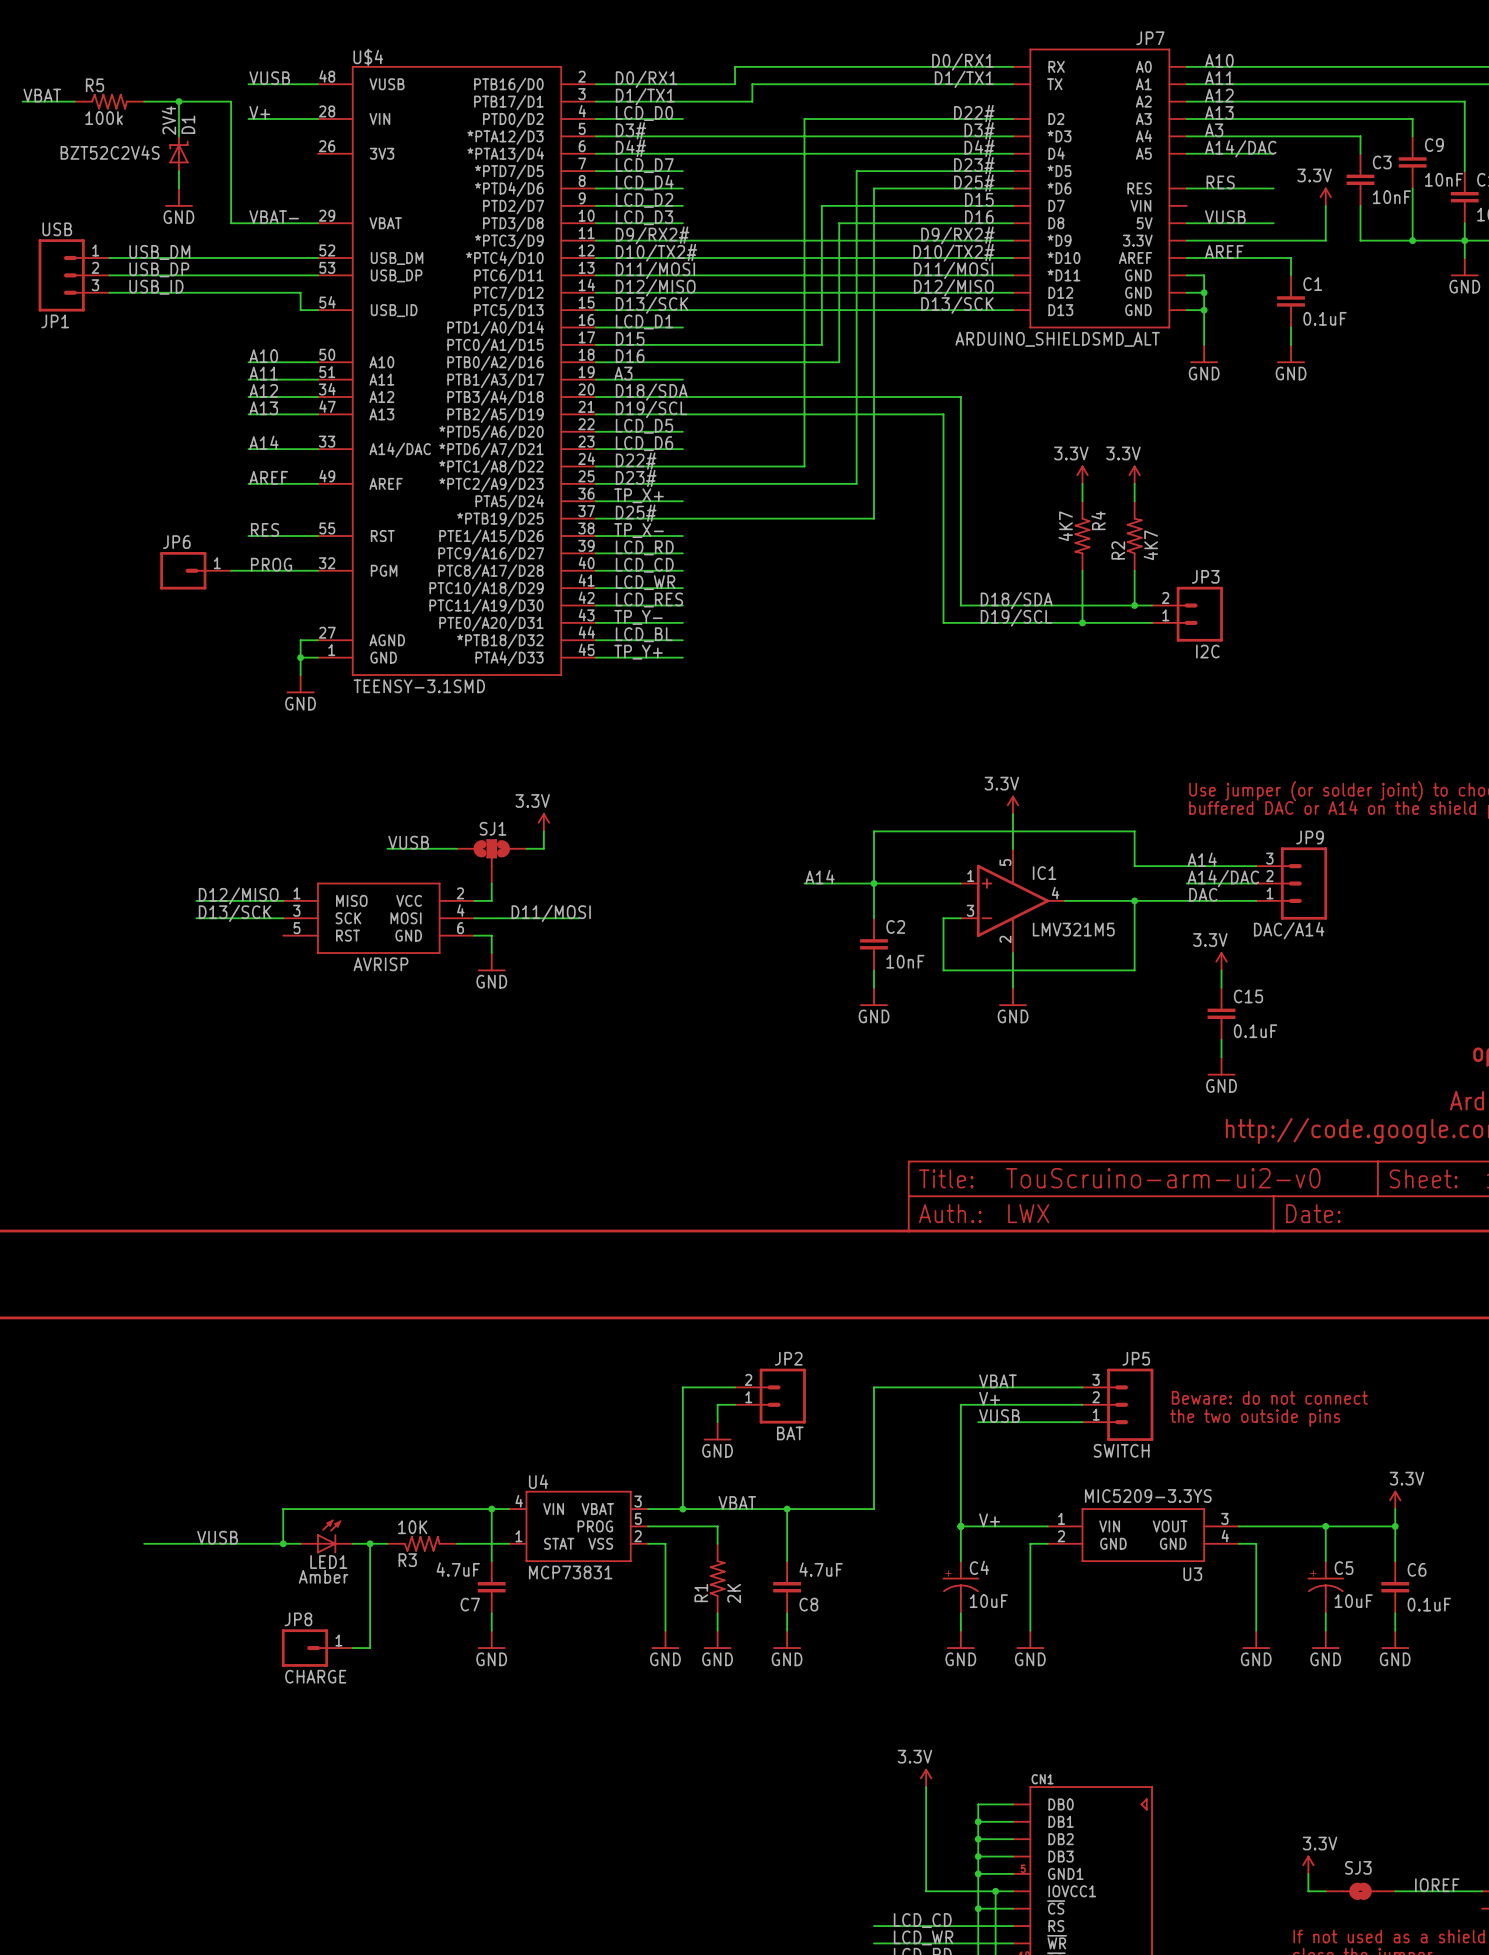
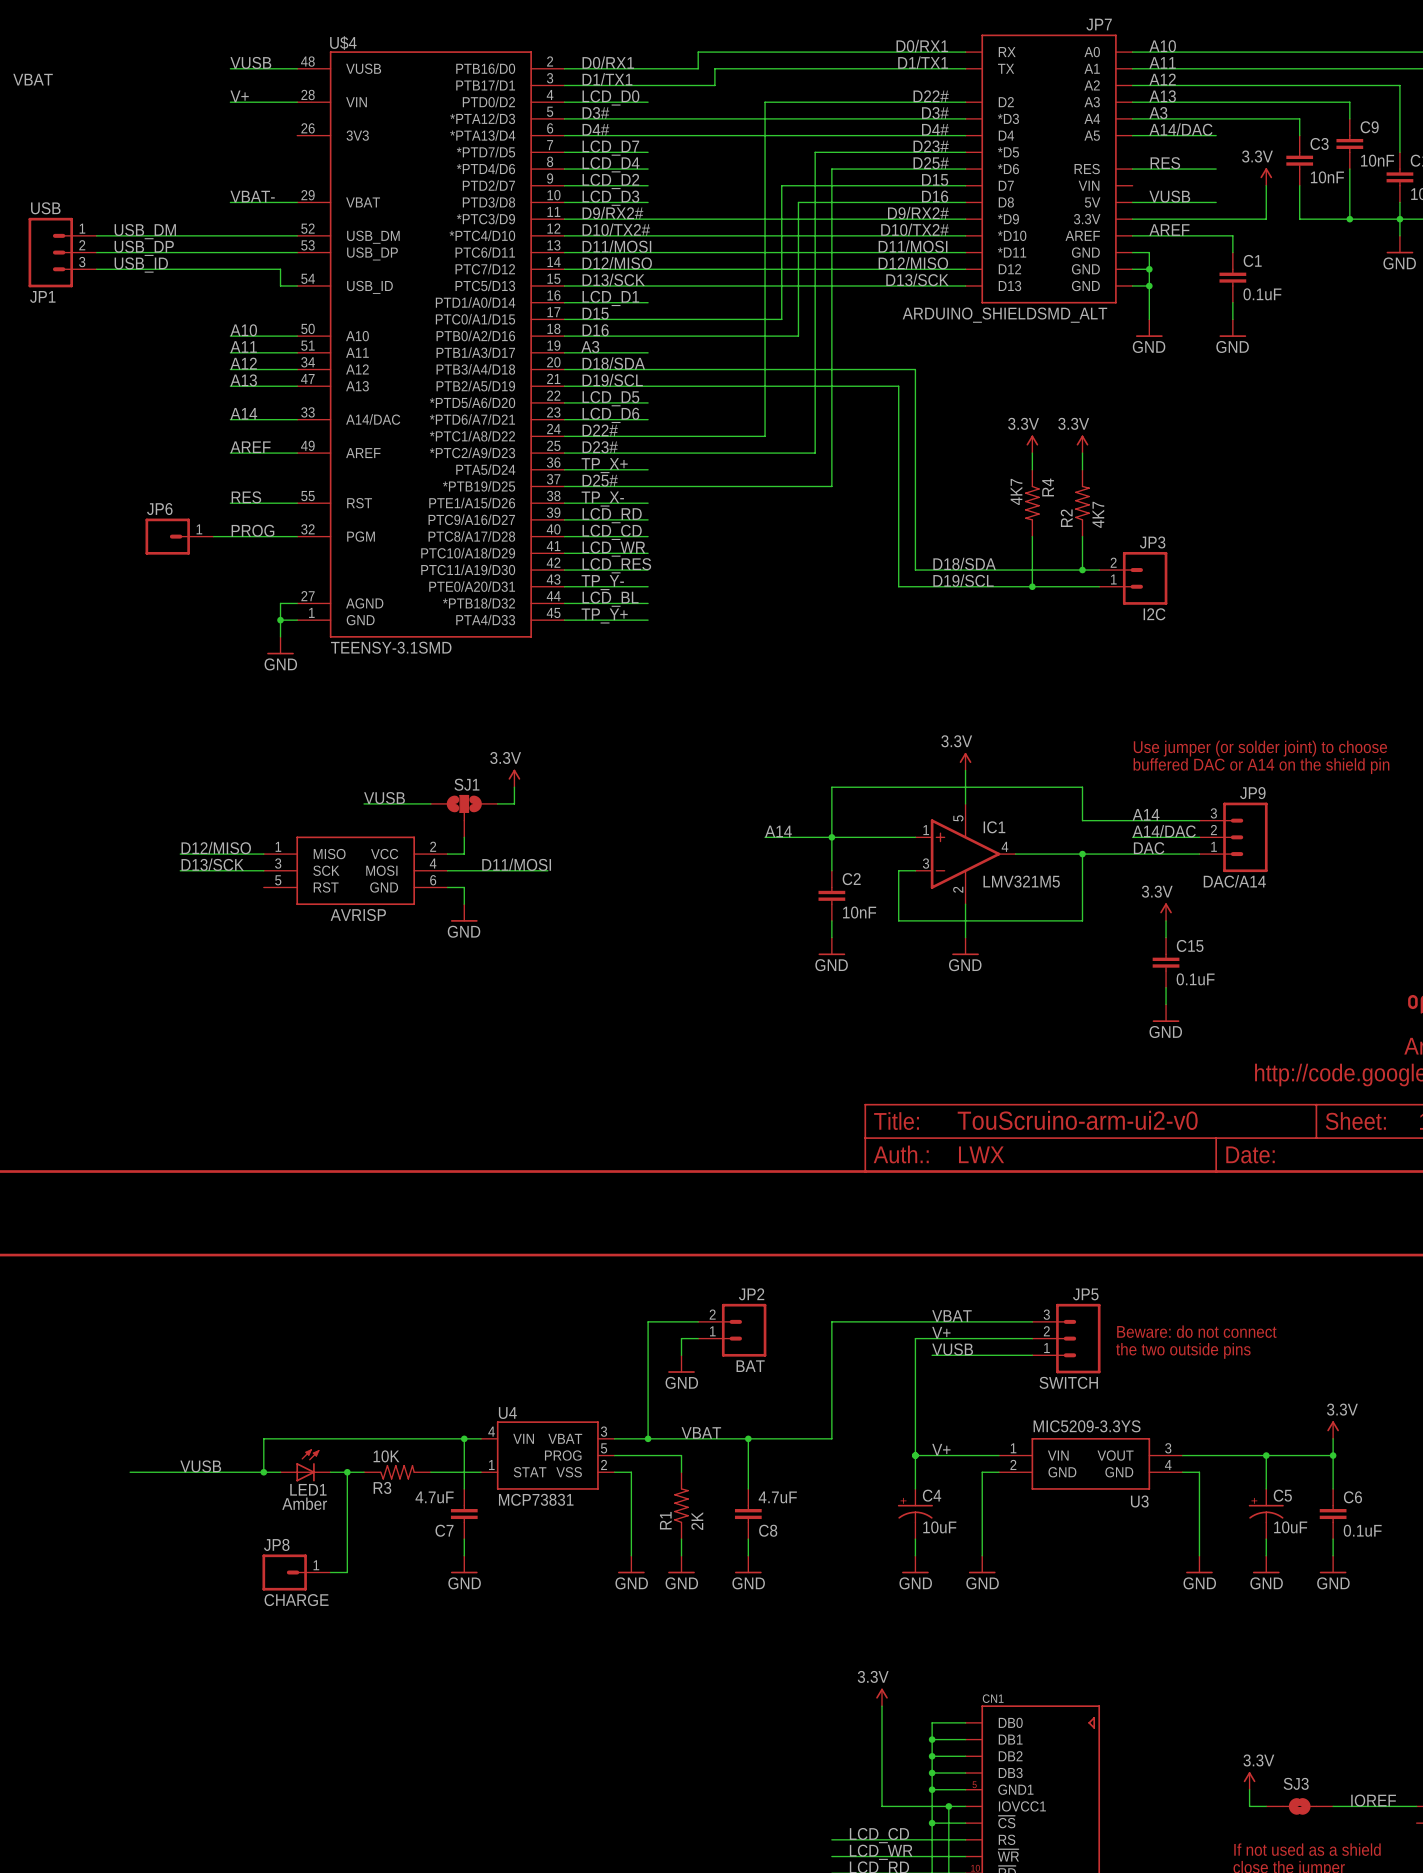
wire: (22, 101) (74, 101) -> none
R5: 100k (109, 101) -> none
wire: (144, 101) (231, 101) (231, 223) (248, 223) -> none
wire: (178, 101) (178, 136) -> none
junction: (178, 101) -> none
text: BZT52C2V4S (110, 152) -> none
D1: 2V4 (178, 153) -> none
wire: (178, 171) (178, 188) -> none
power symbol: GND (178, 197) -> none

